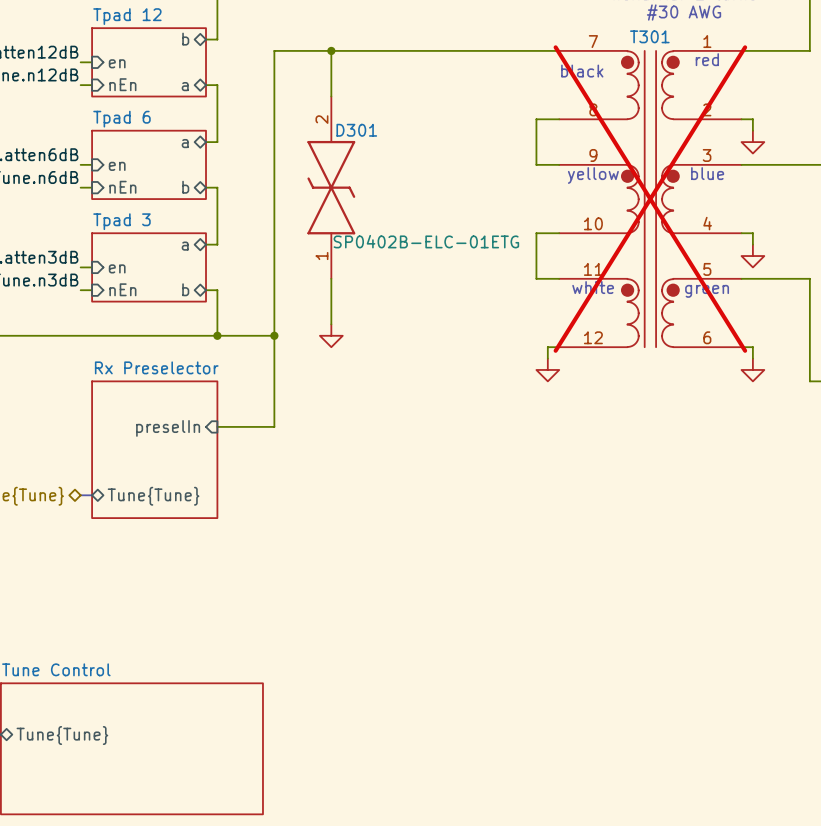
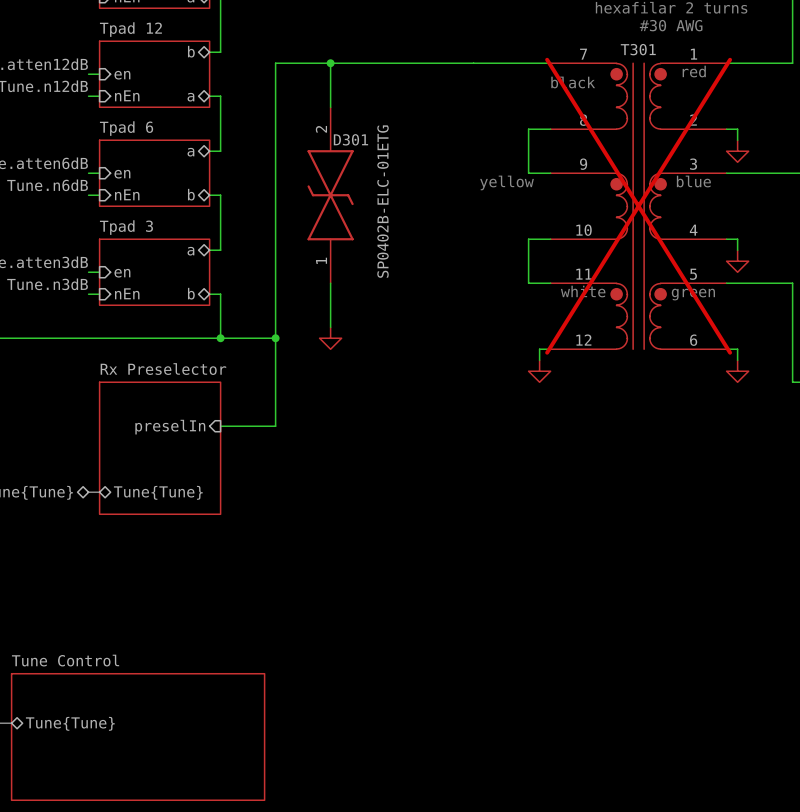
text position: yellow (593, 175) -> yellow (506, 182)
D301 value rotation: 0° (426, 241) -> 90° counterclockwise (383, 201)

